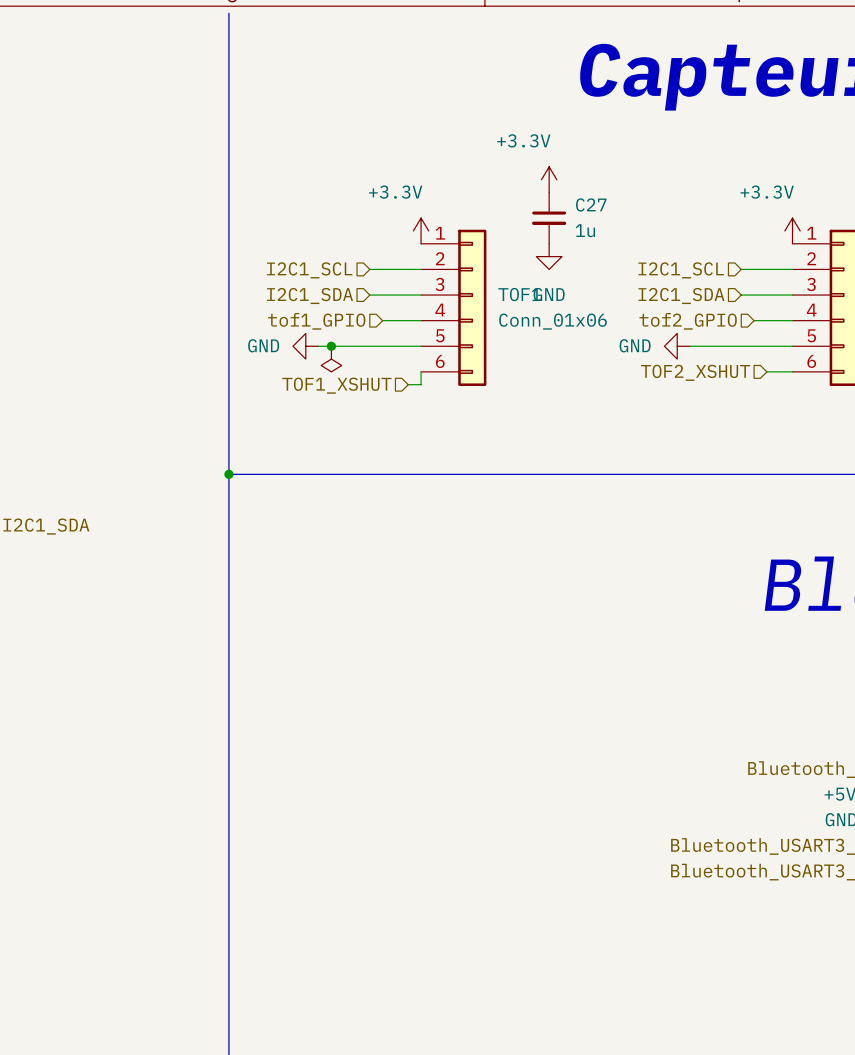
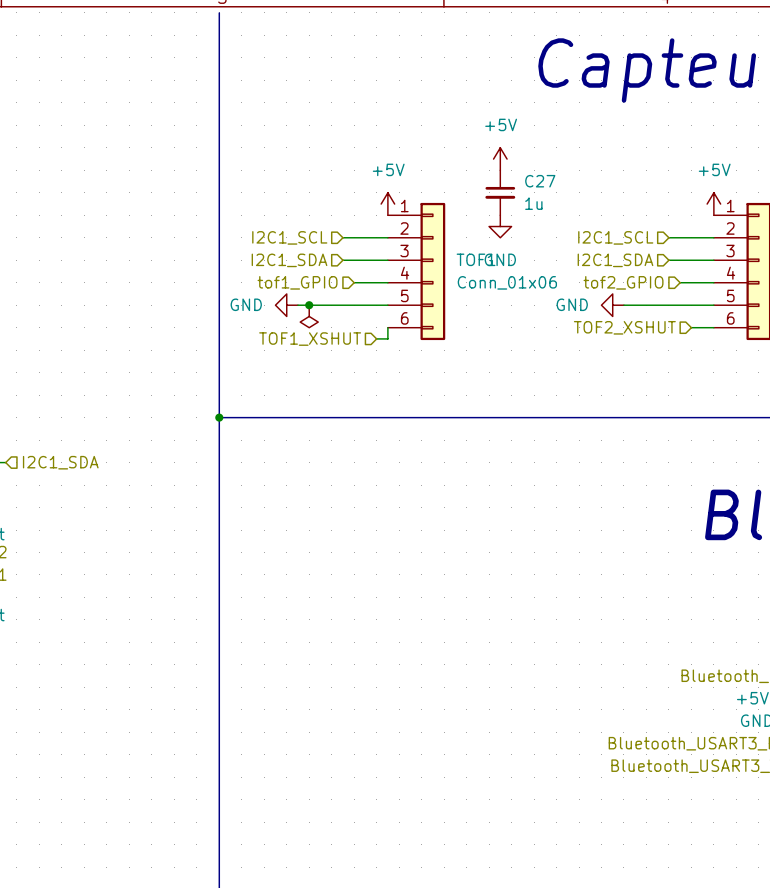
power symbol: +3.3V (549, 179) -> +5V (500, 159)
power symbol: +3.3V (421, 230) -> +5V (387, 204)
power symbol: +3.3V (792, 230) -> +5V (713, 204)

